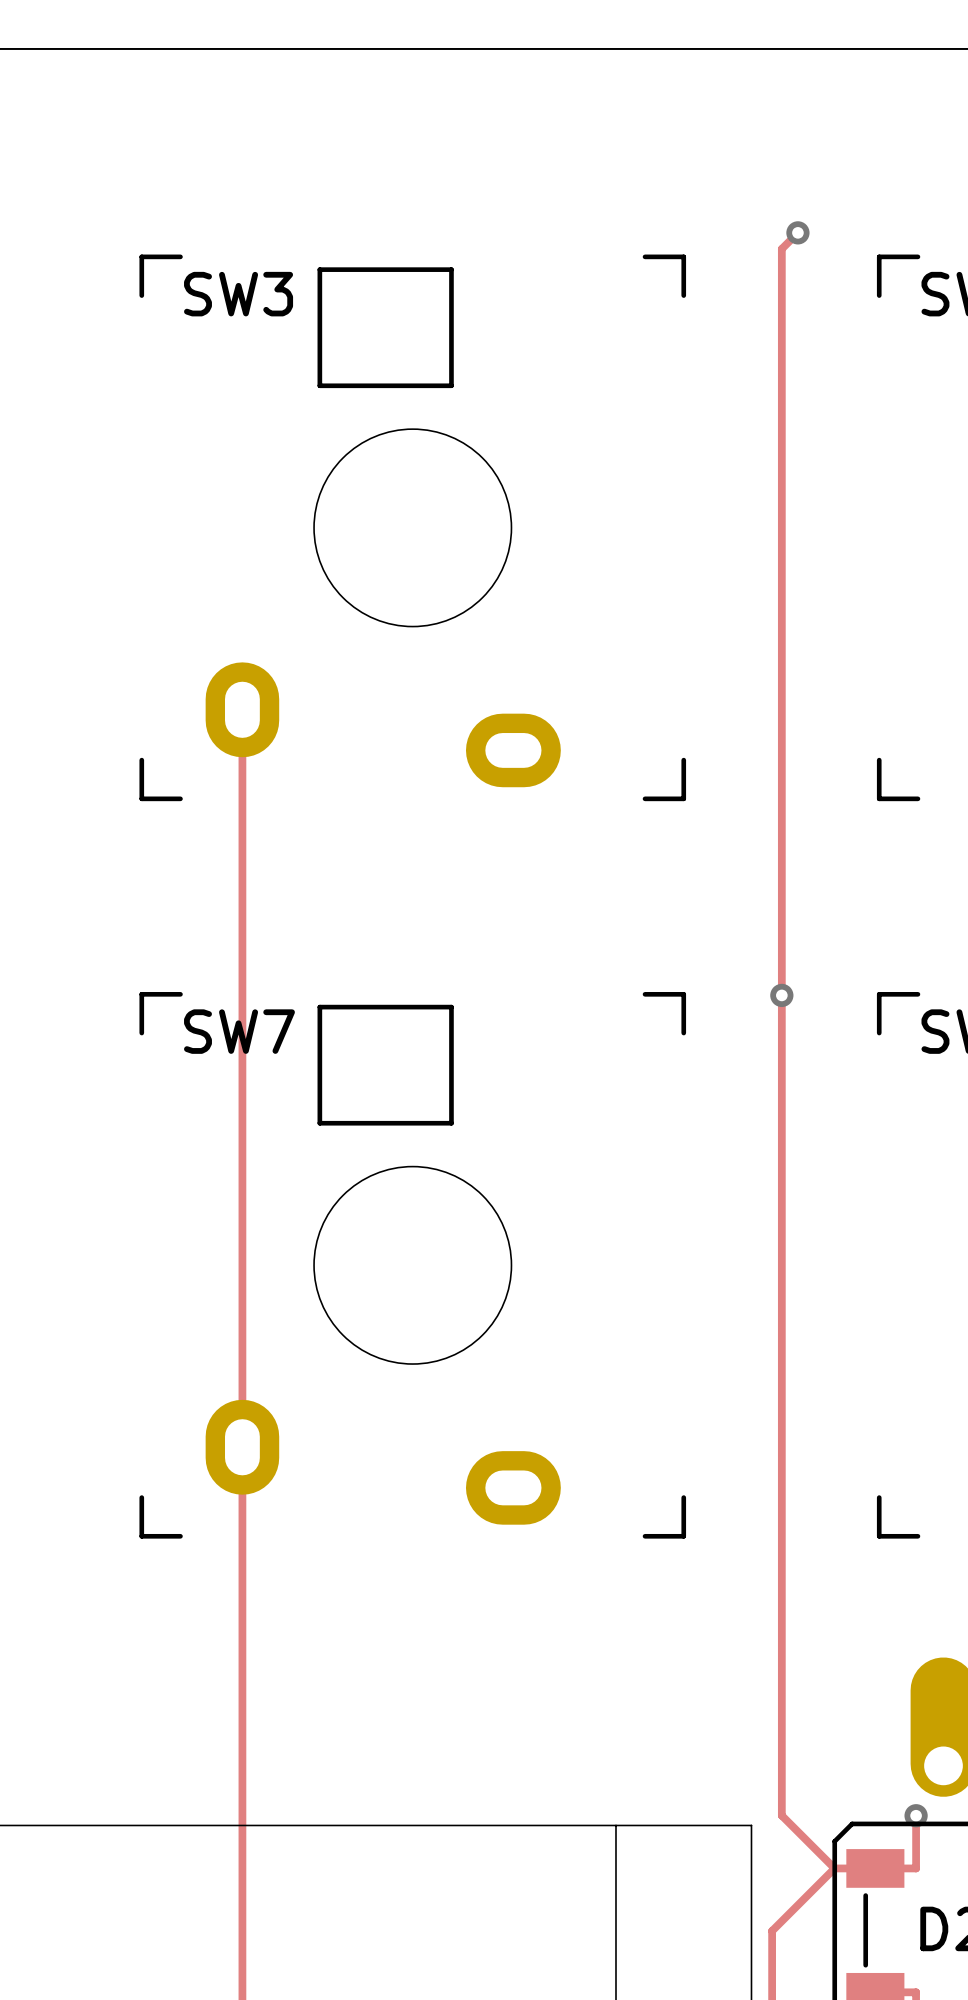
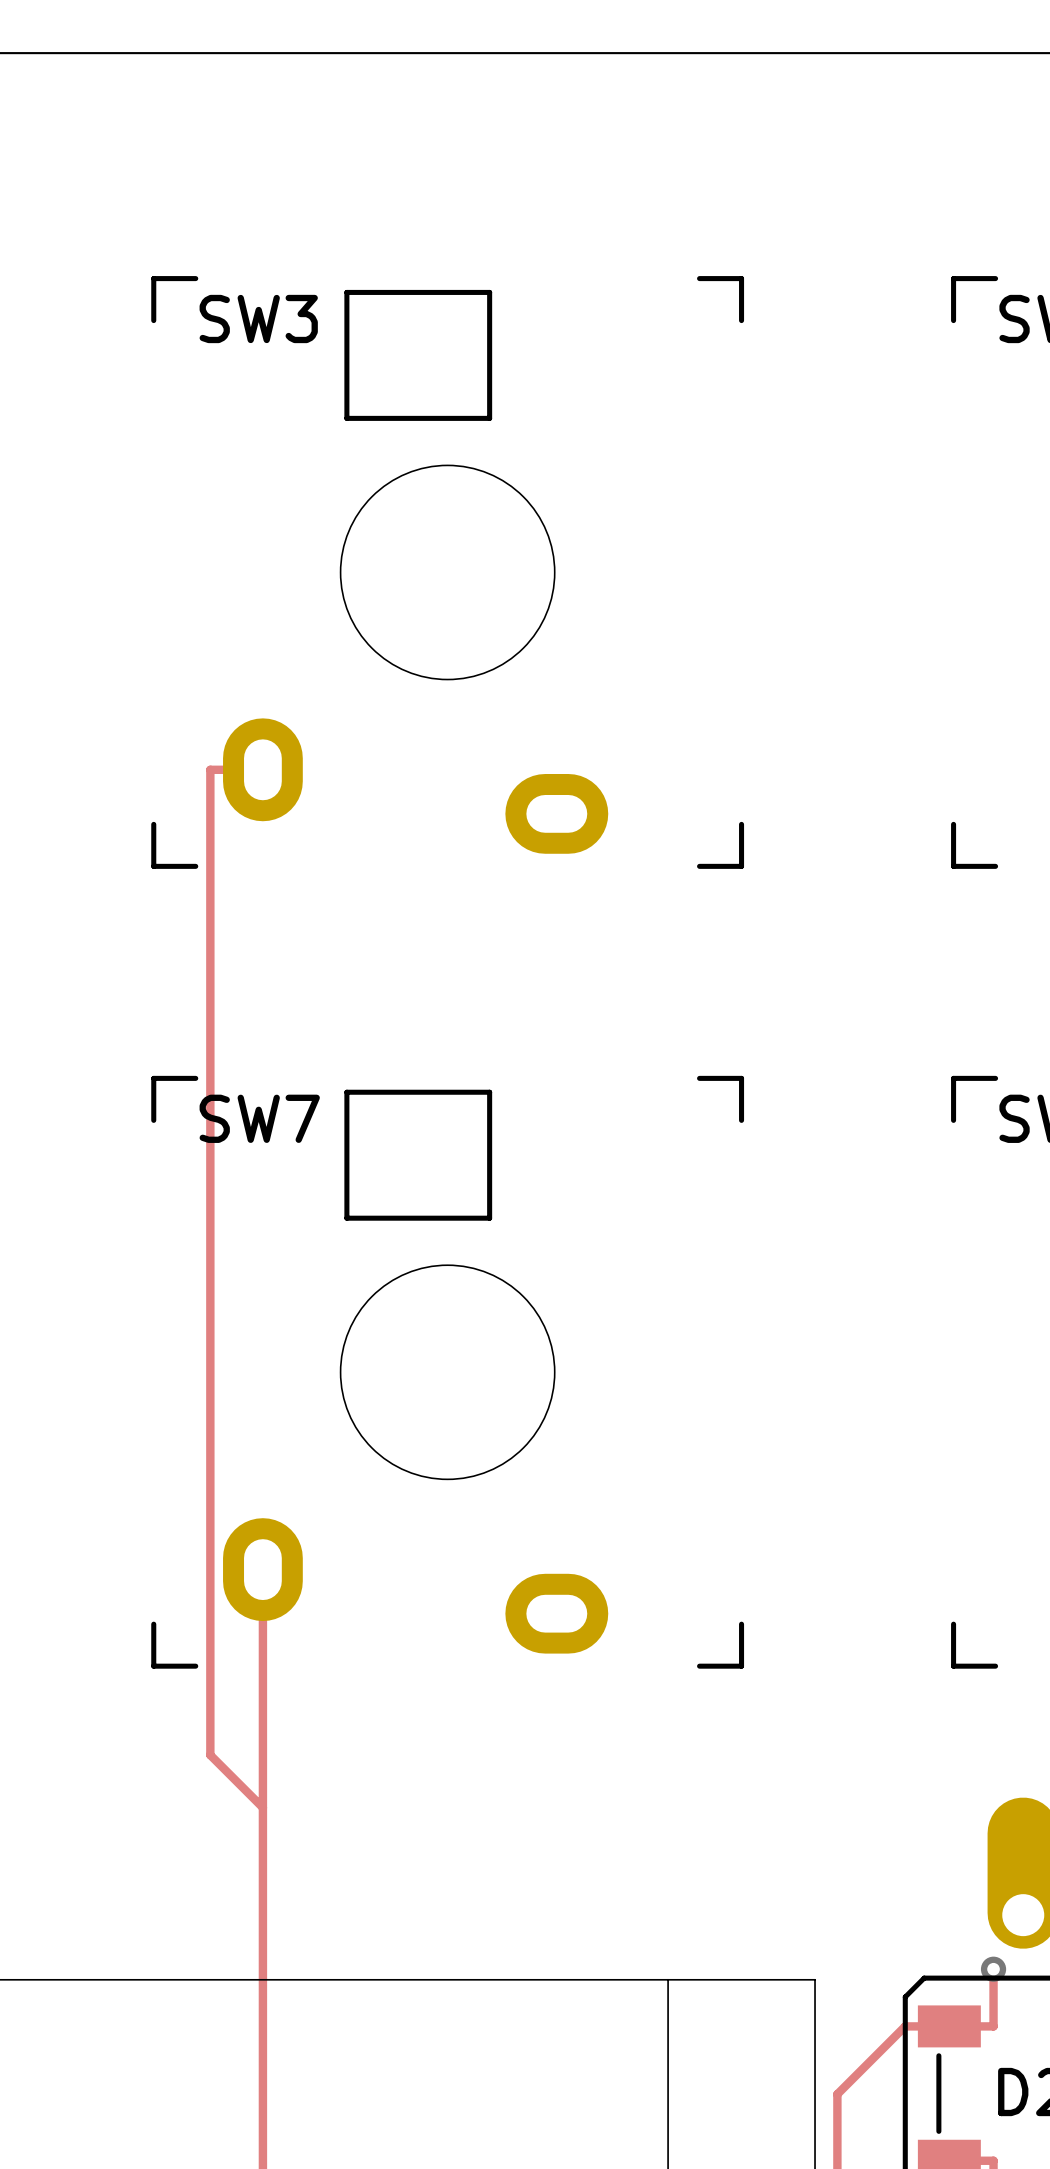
track: (797, 232) (781, 248) (781, 1815) (834, 1868) -> none
via: (797, 232) -> none
track: (242, 709) (242, 1447) -> (262, 769) (210, 769) (210, 1755) (262, 1807)
via: (781, 995) -> none

